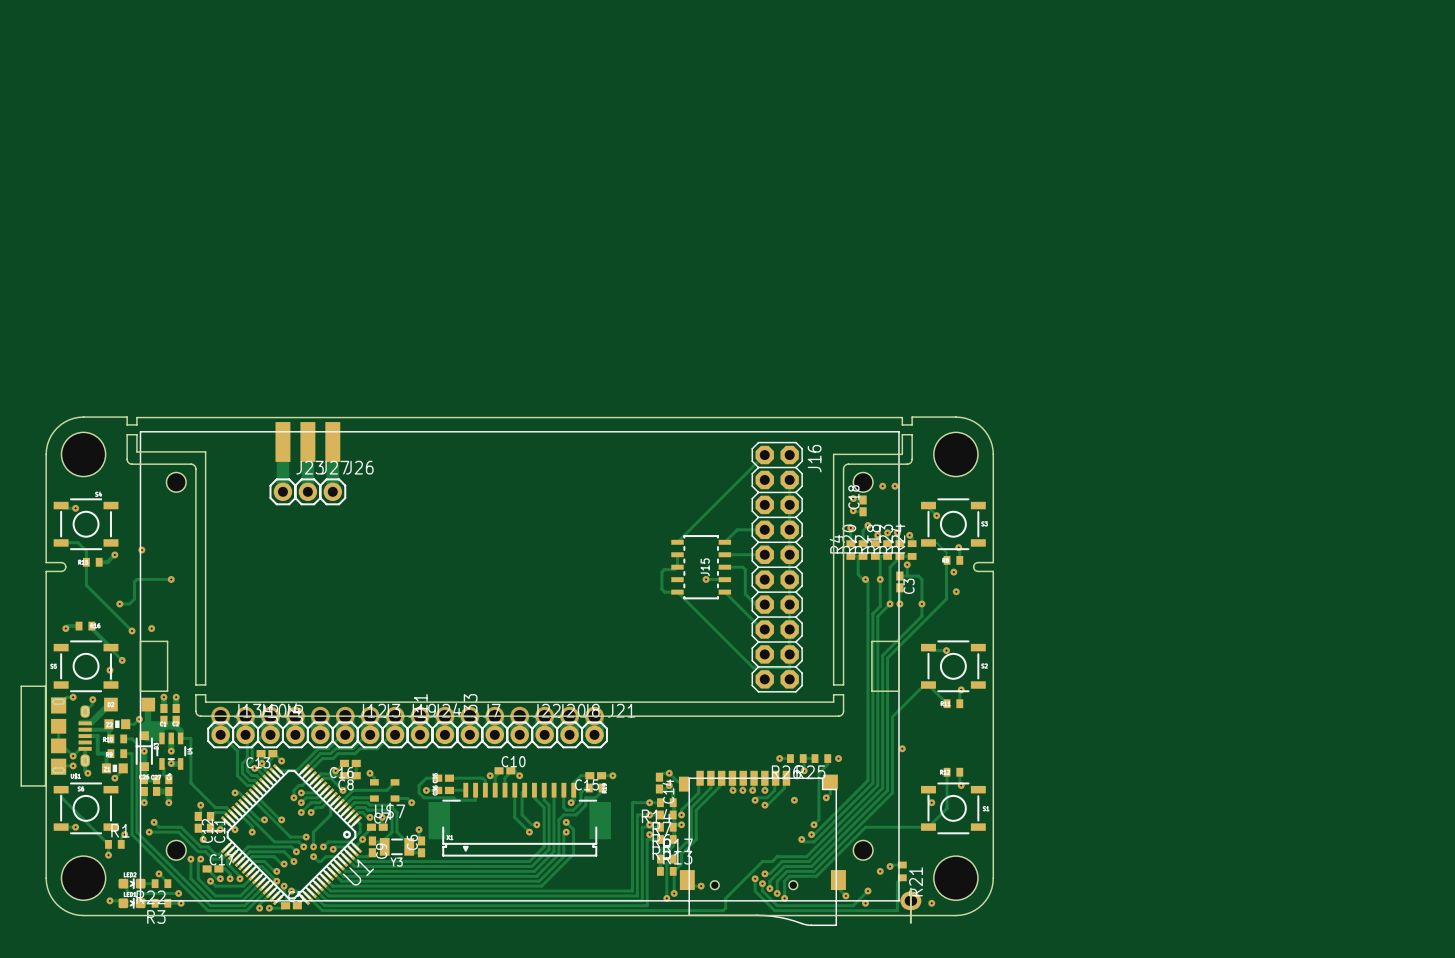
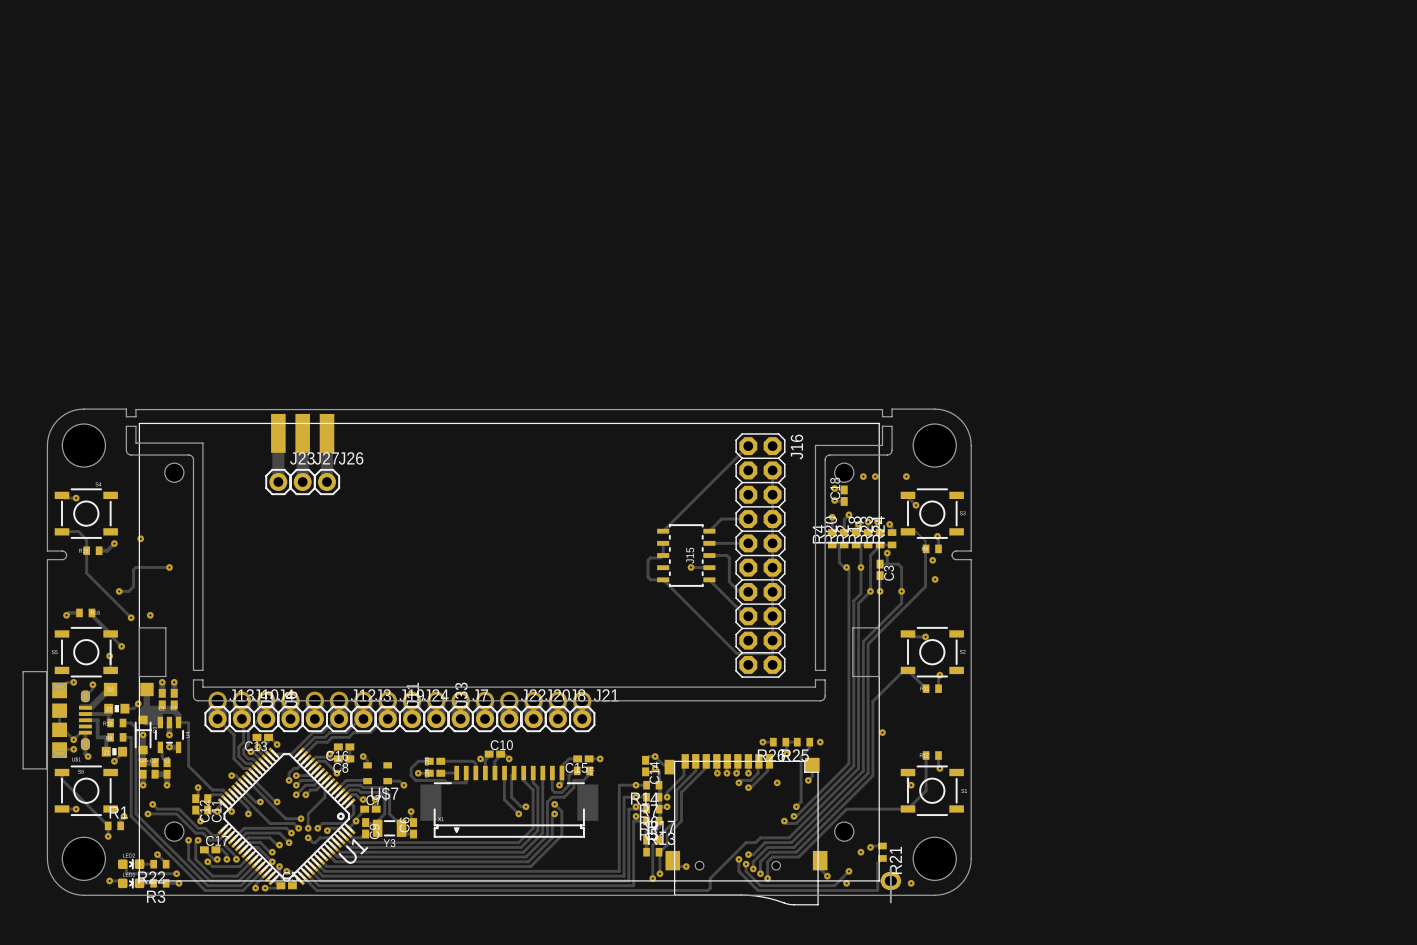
via: none -> (906, 476)
track: (395, 782) (387, 790) (353, 790) -> none
track: (353, 790) (339, 803) -> none

